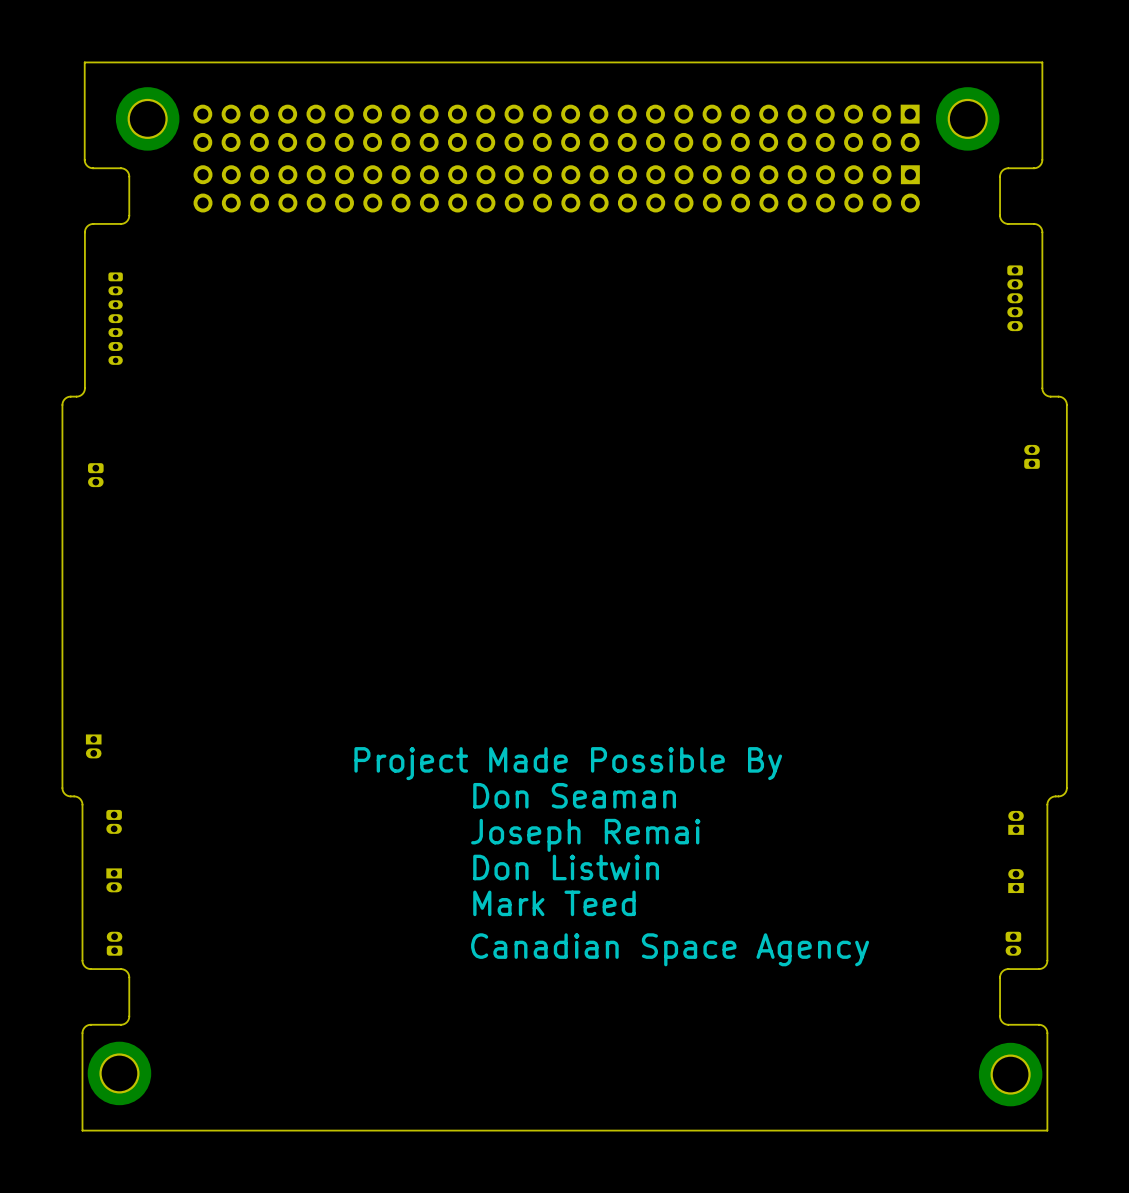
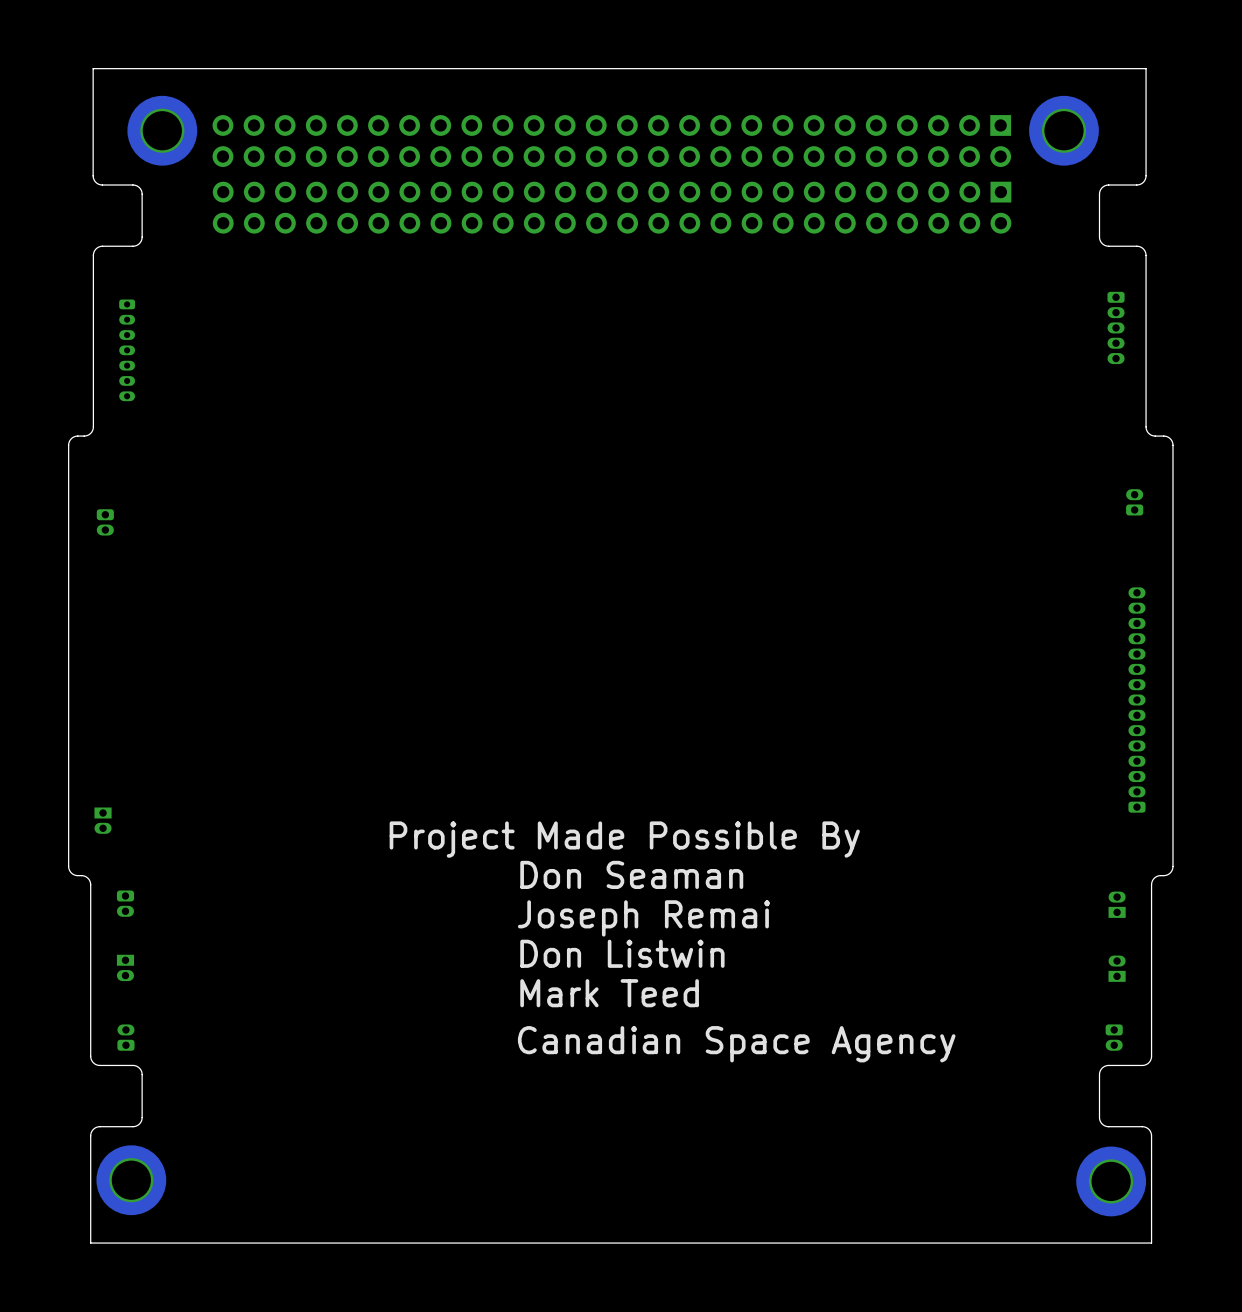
part: none -> (1136, 699)

